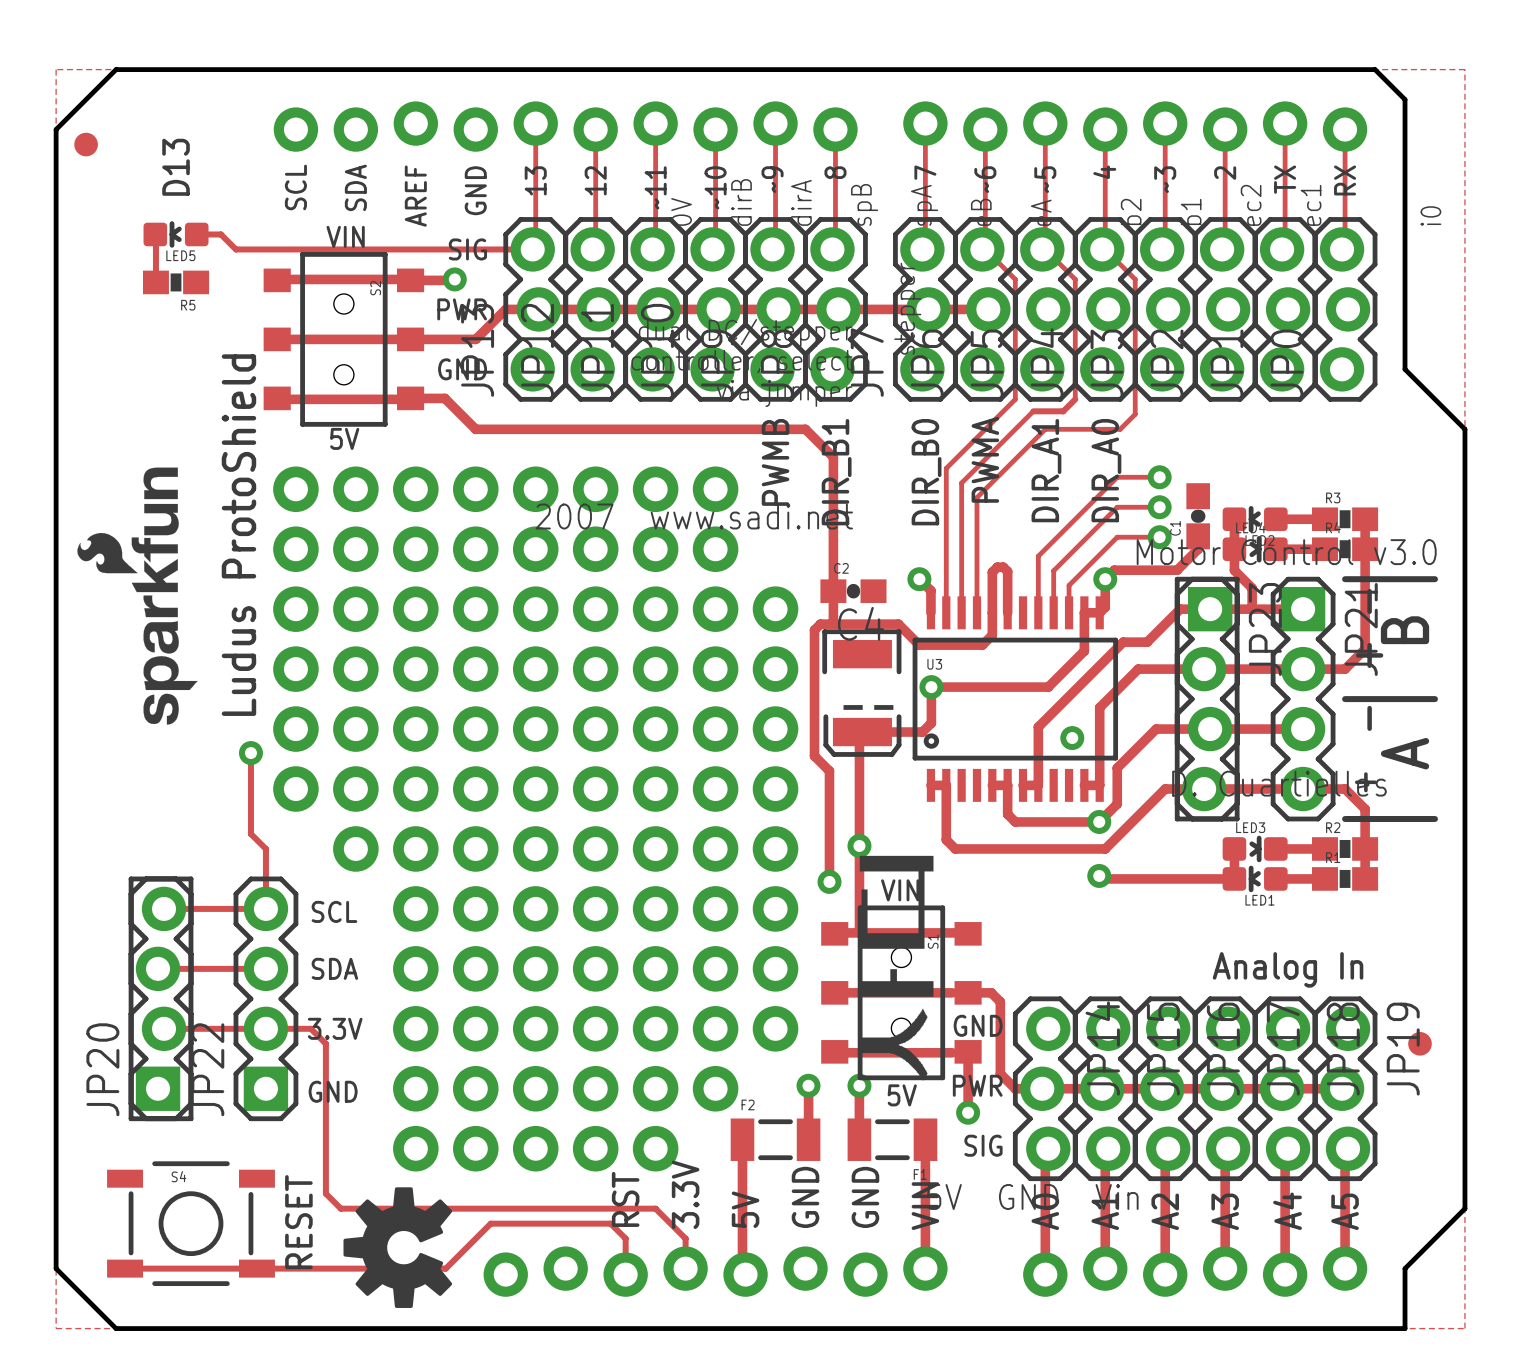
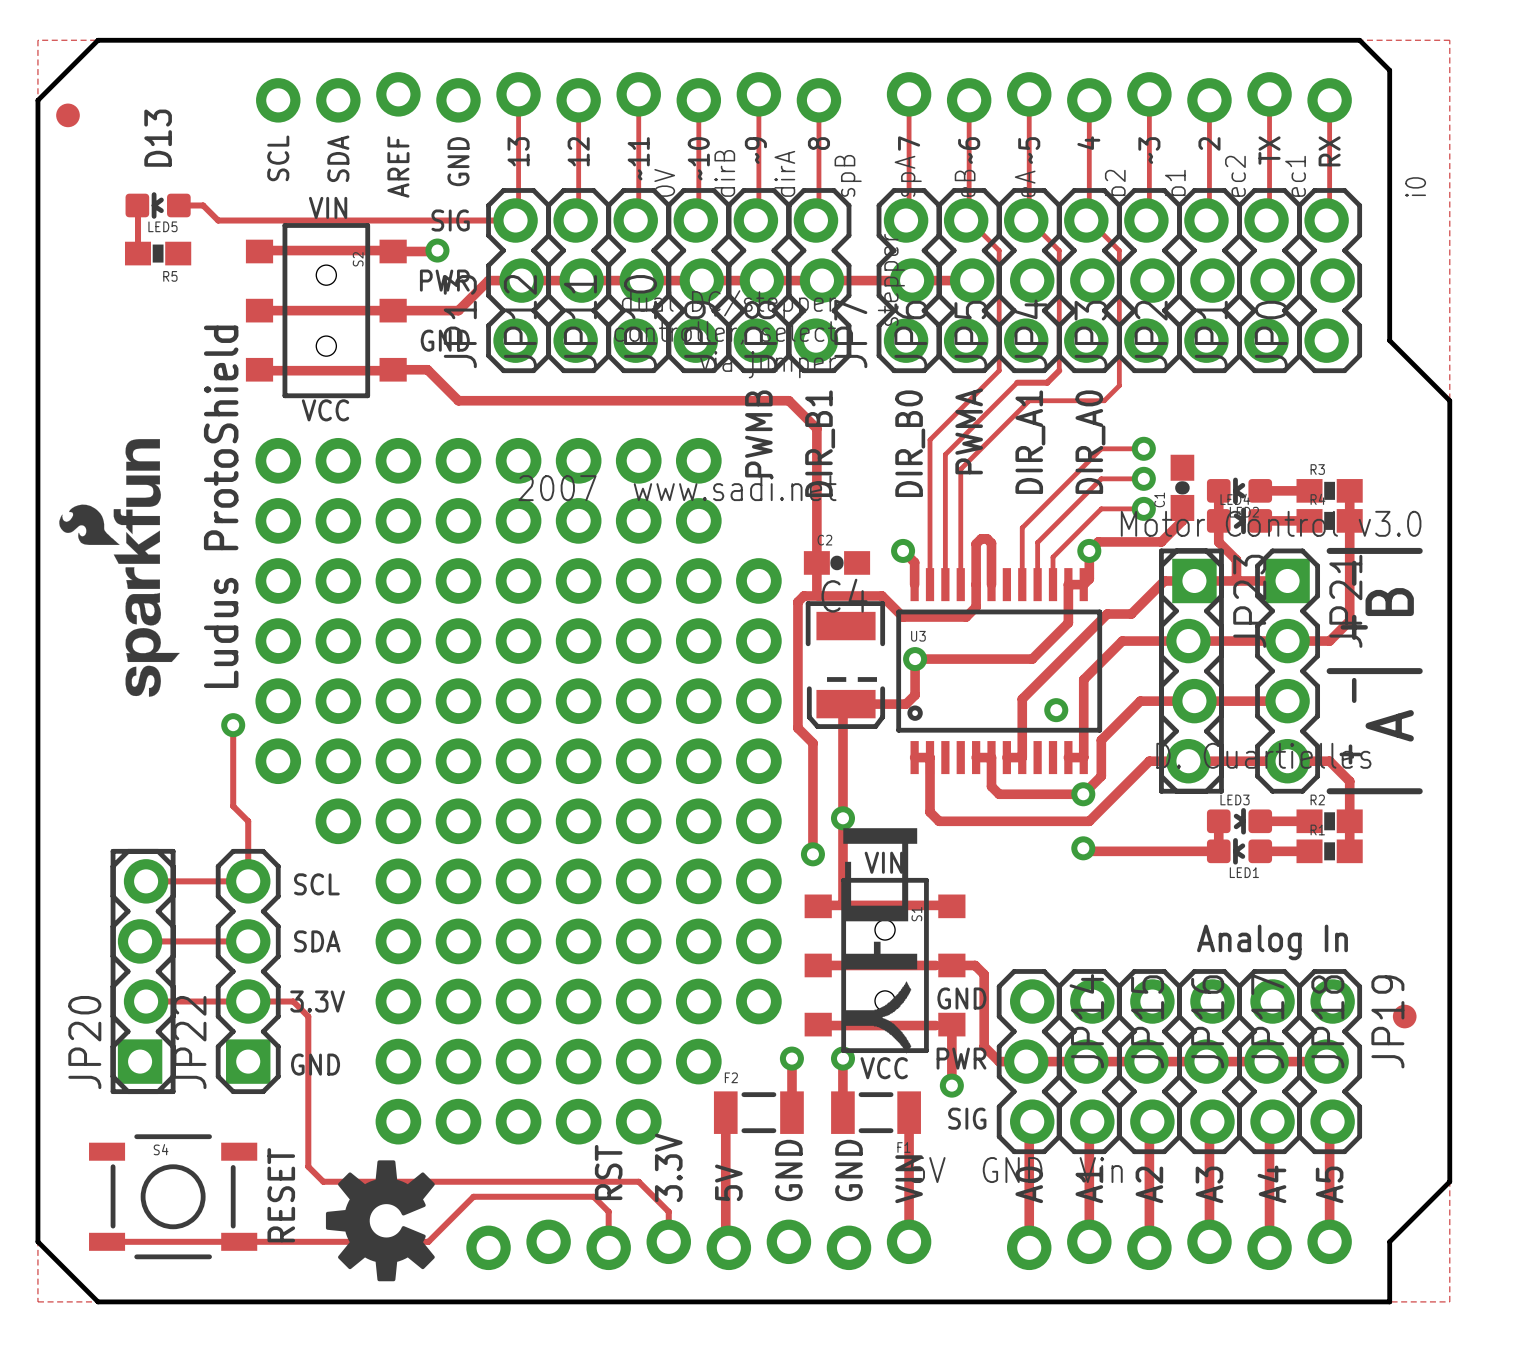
text: 5V (344, 438) -> VCC (325, 410)
text: 5V (902, 1095) -> VCC (884, 1068)

